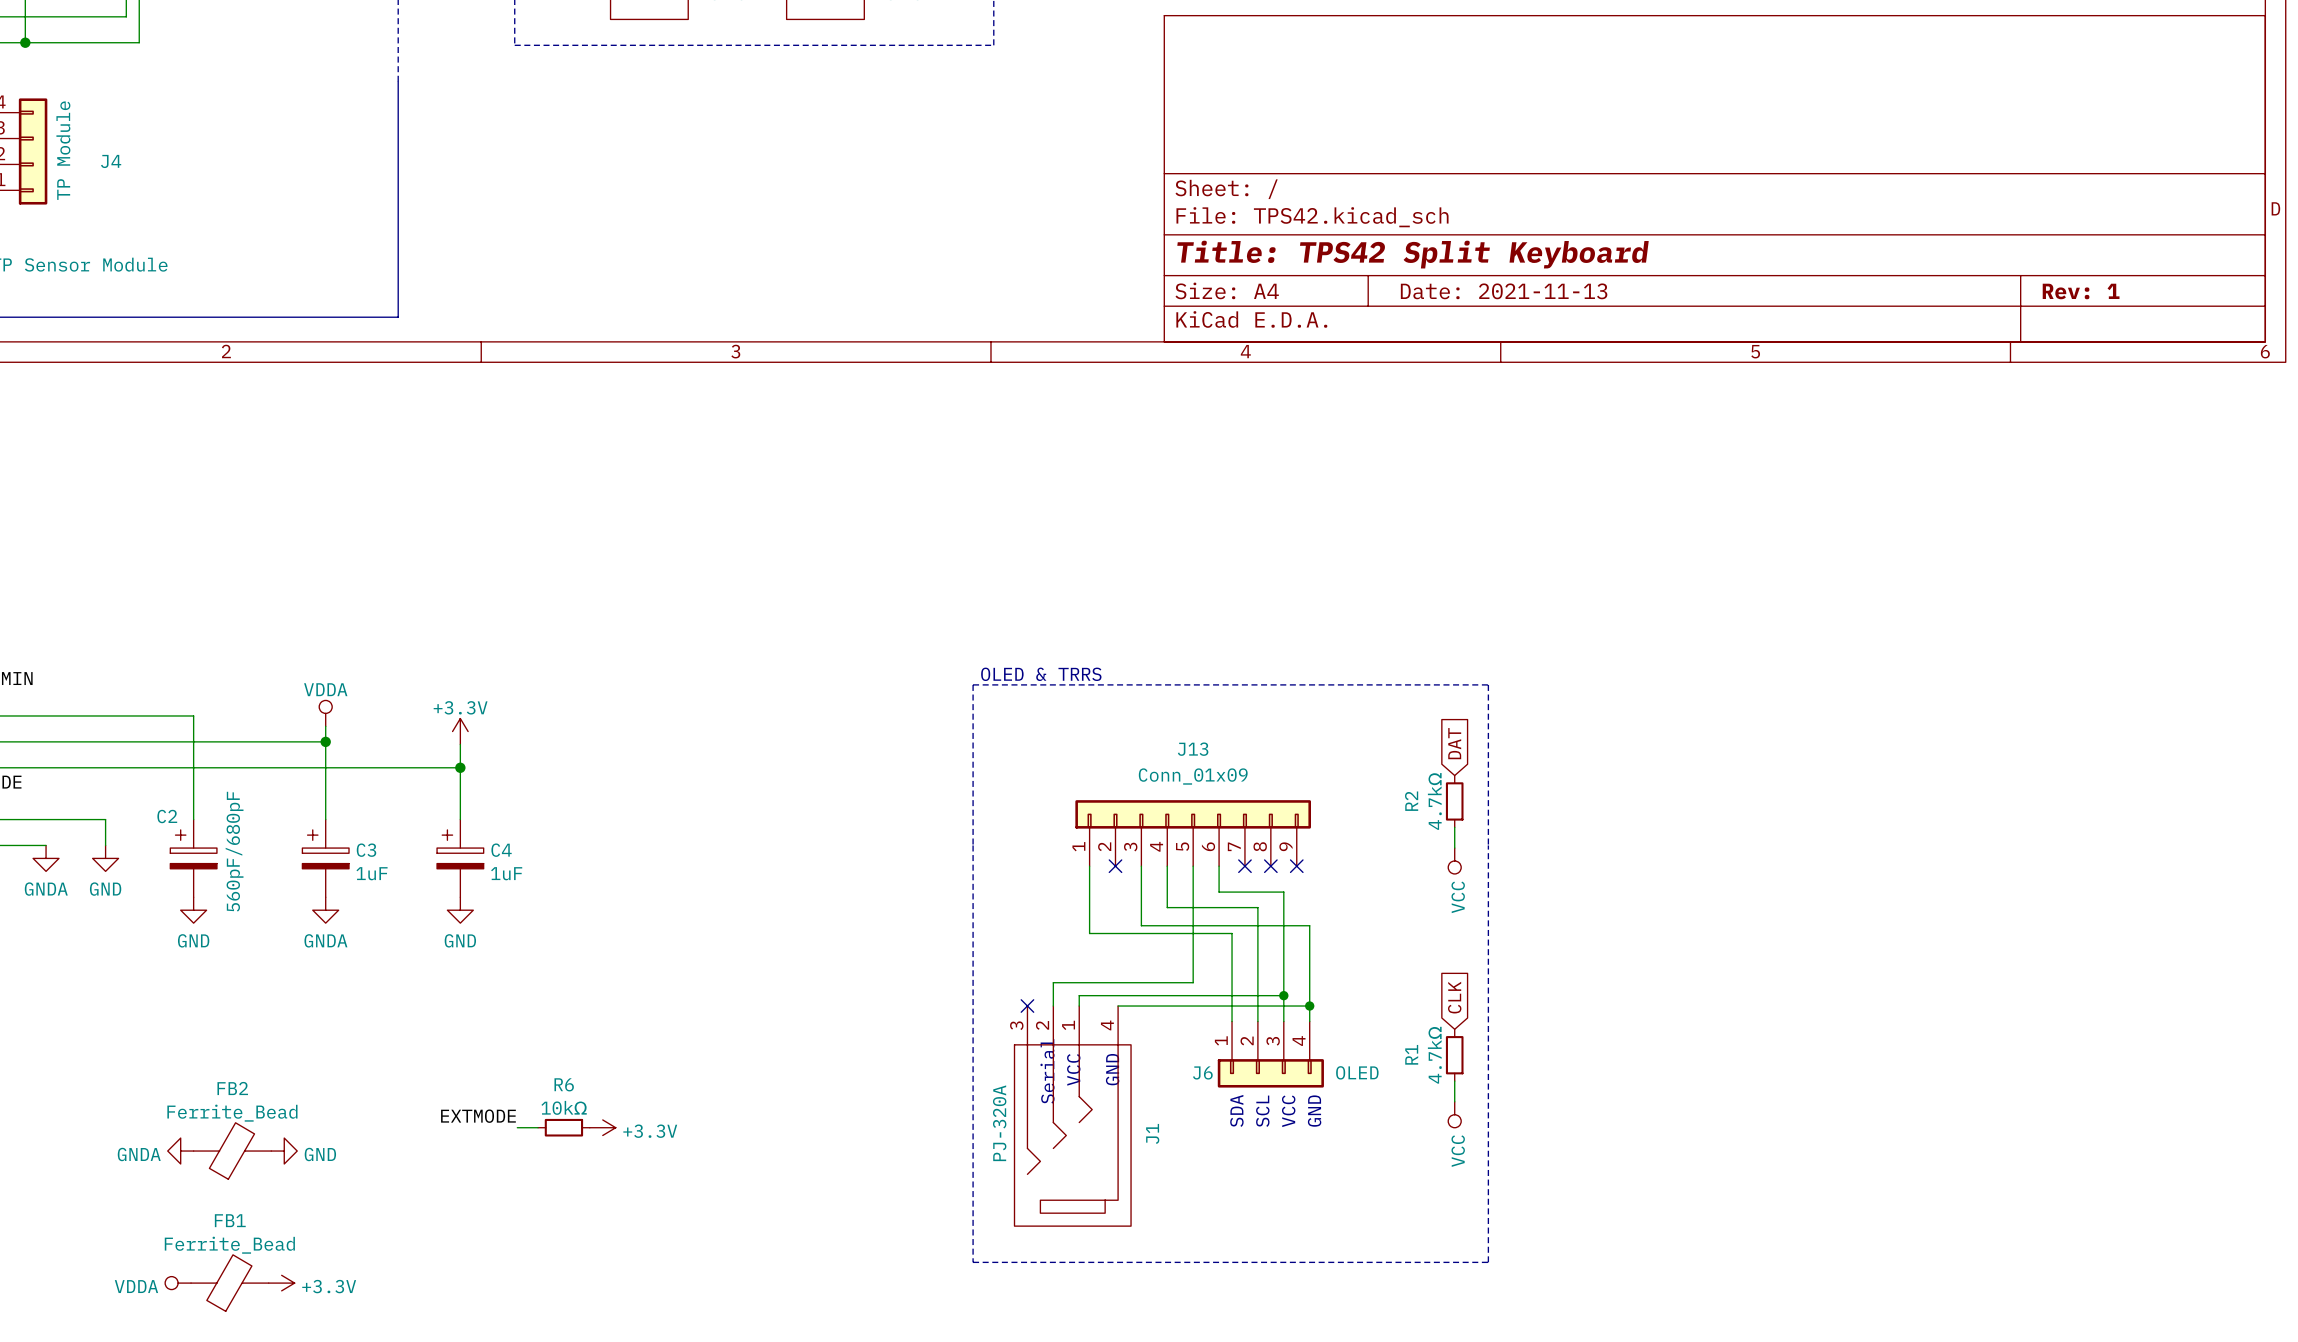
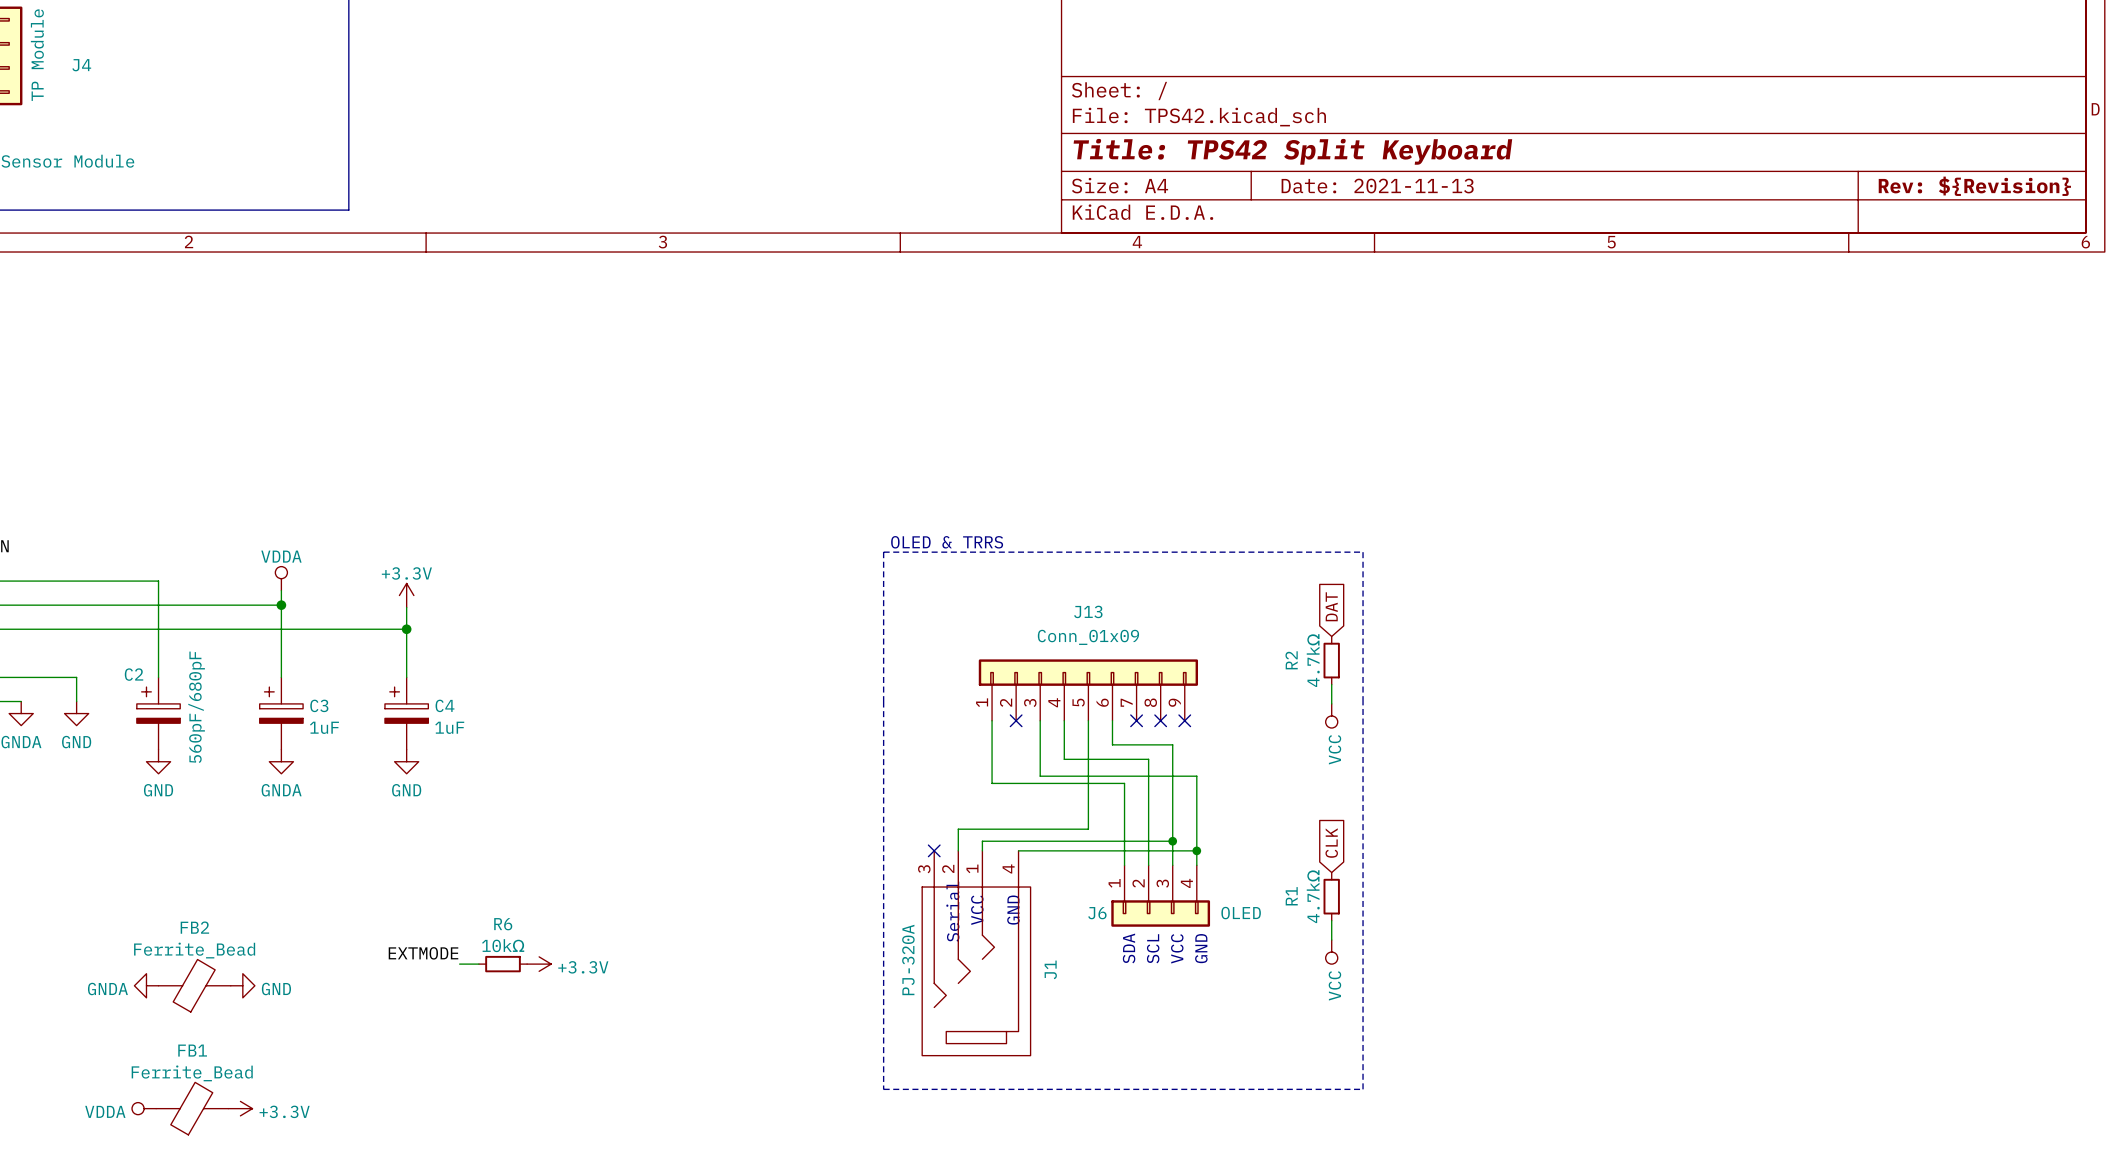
title block: Rev: 1 (2081, 291) -> Rev: ${Revision} (1974, 186)

